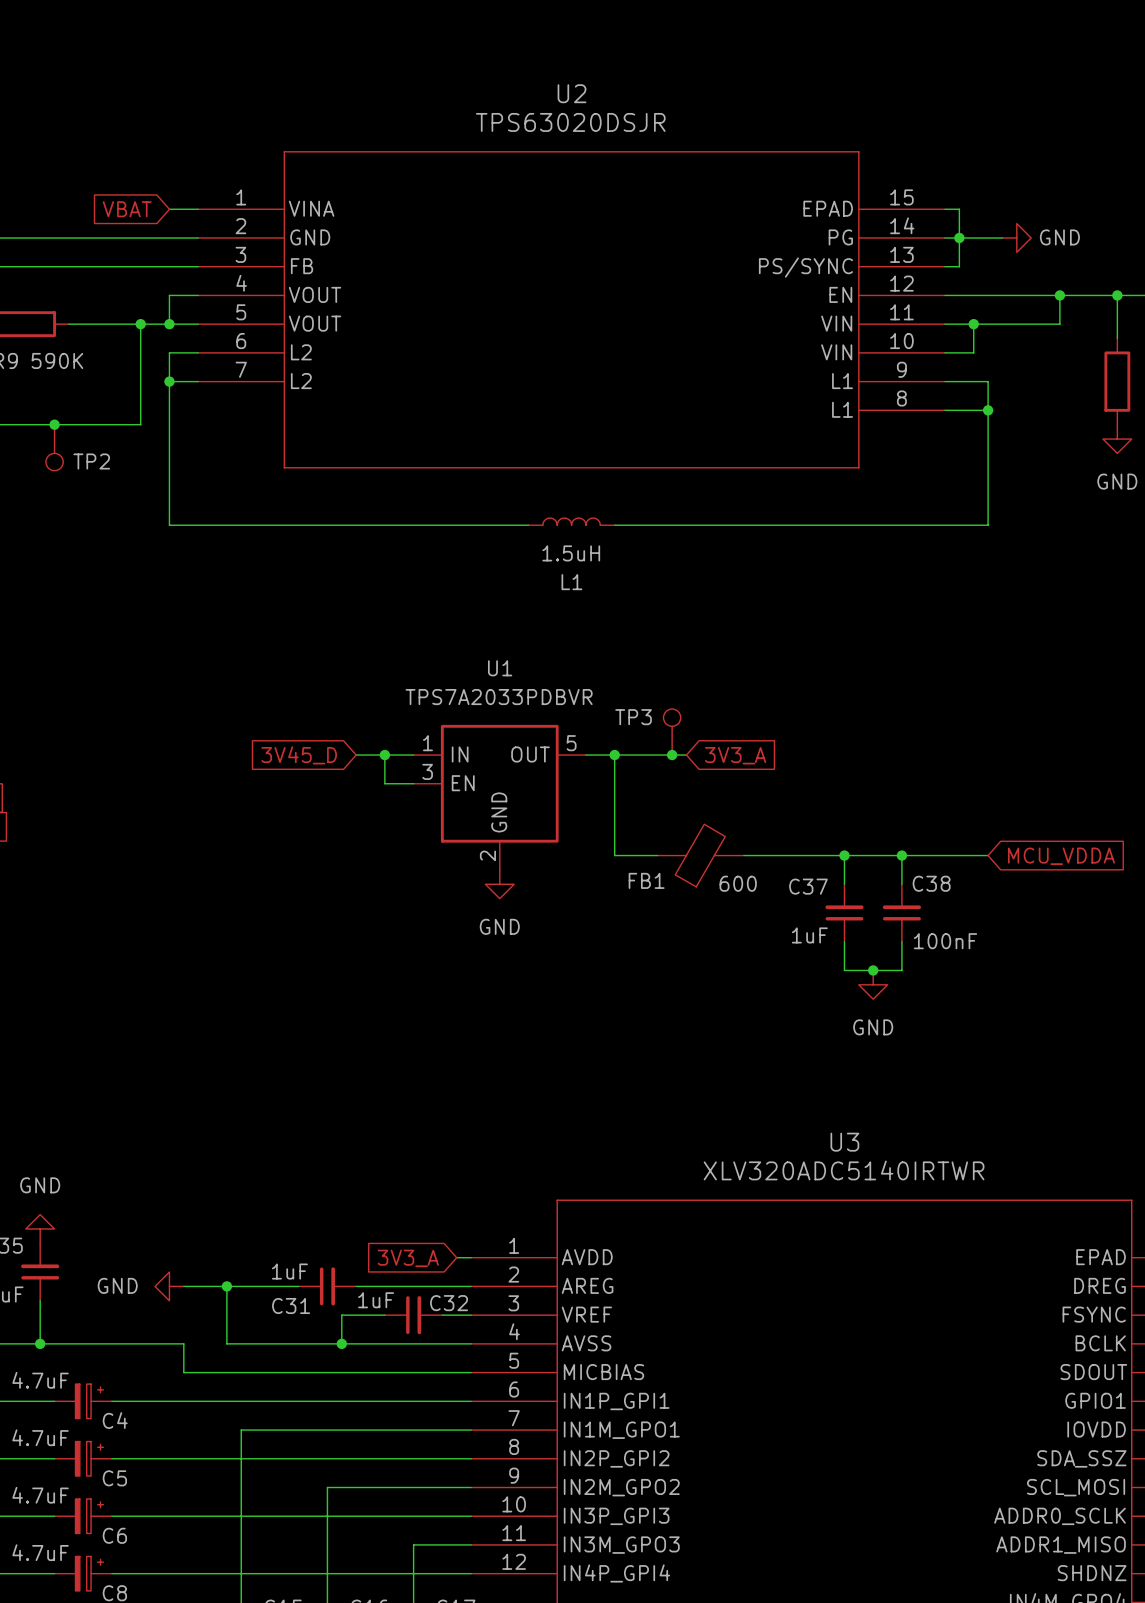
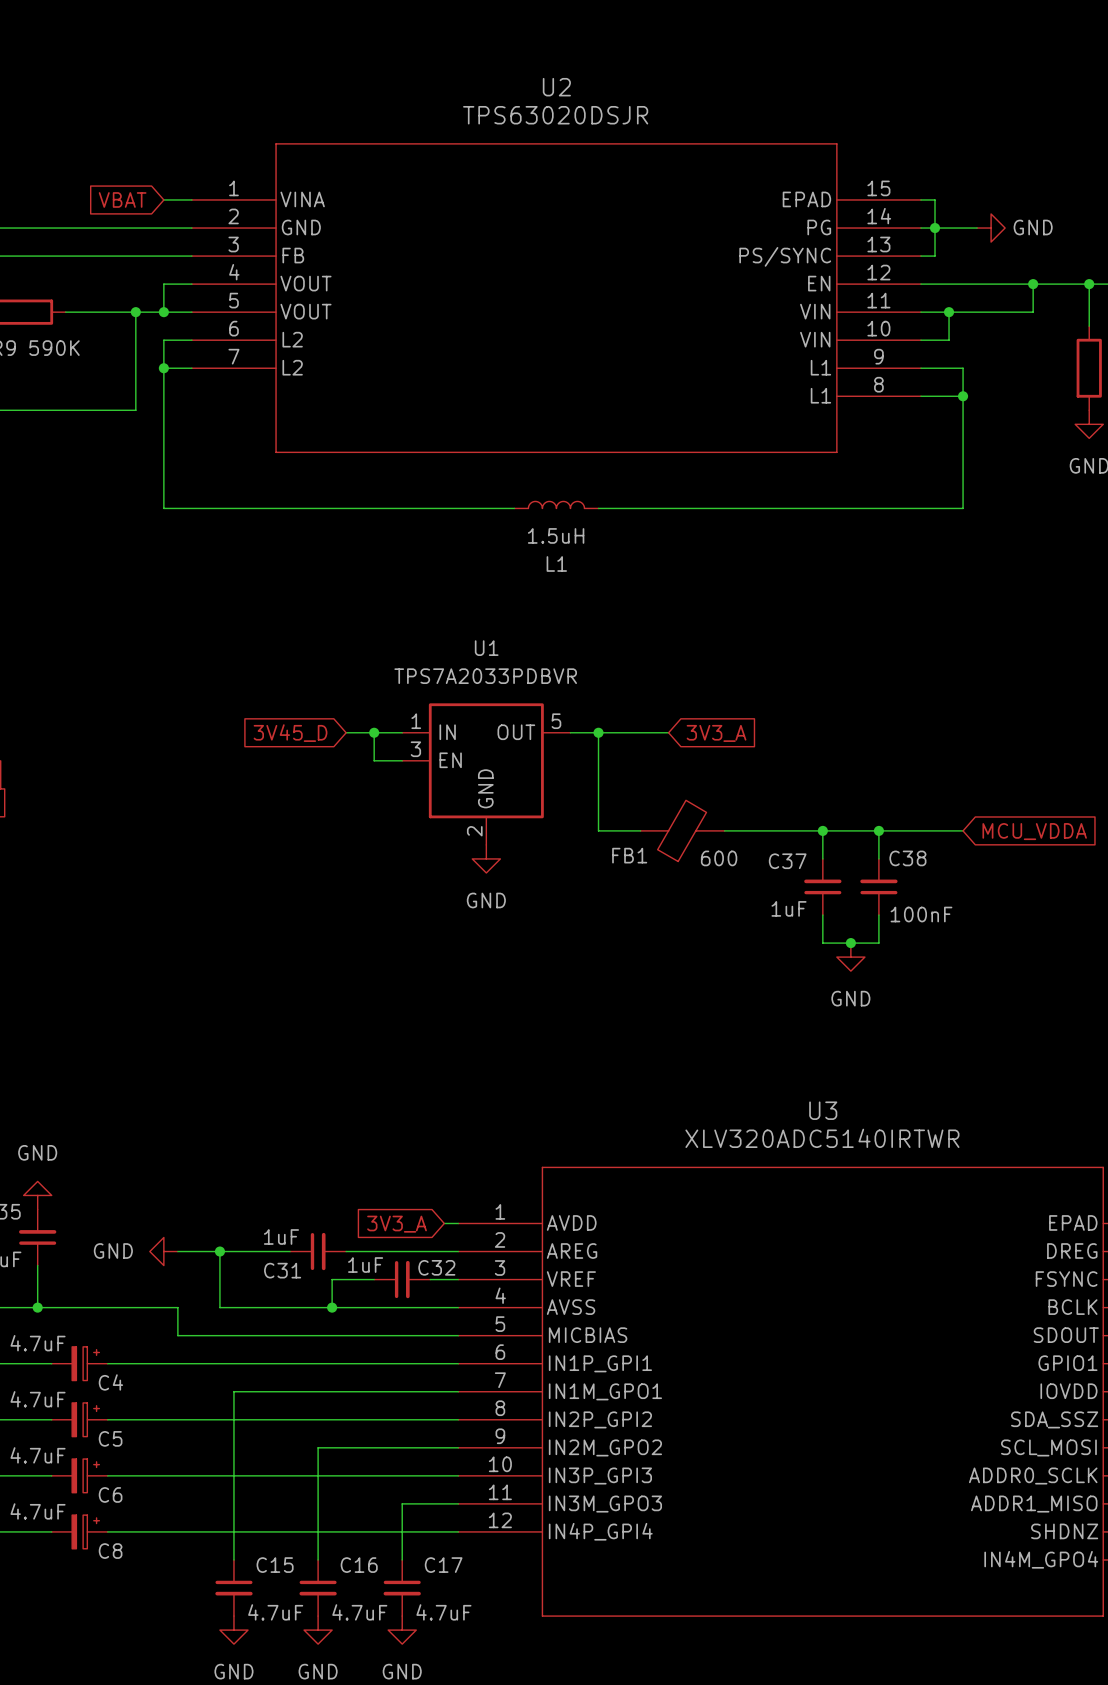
junction: (54, 424) -> none
TP2: (54, 447) -> none
TP3: (672, 732) -> none
junction: (672, 755) -> none

